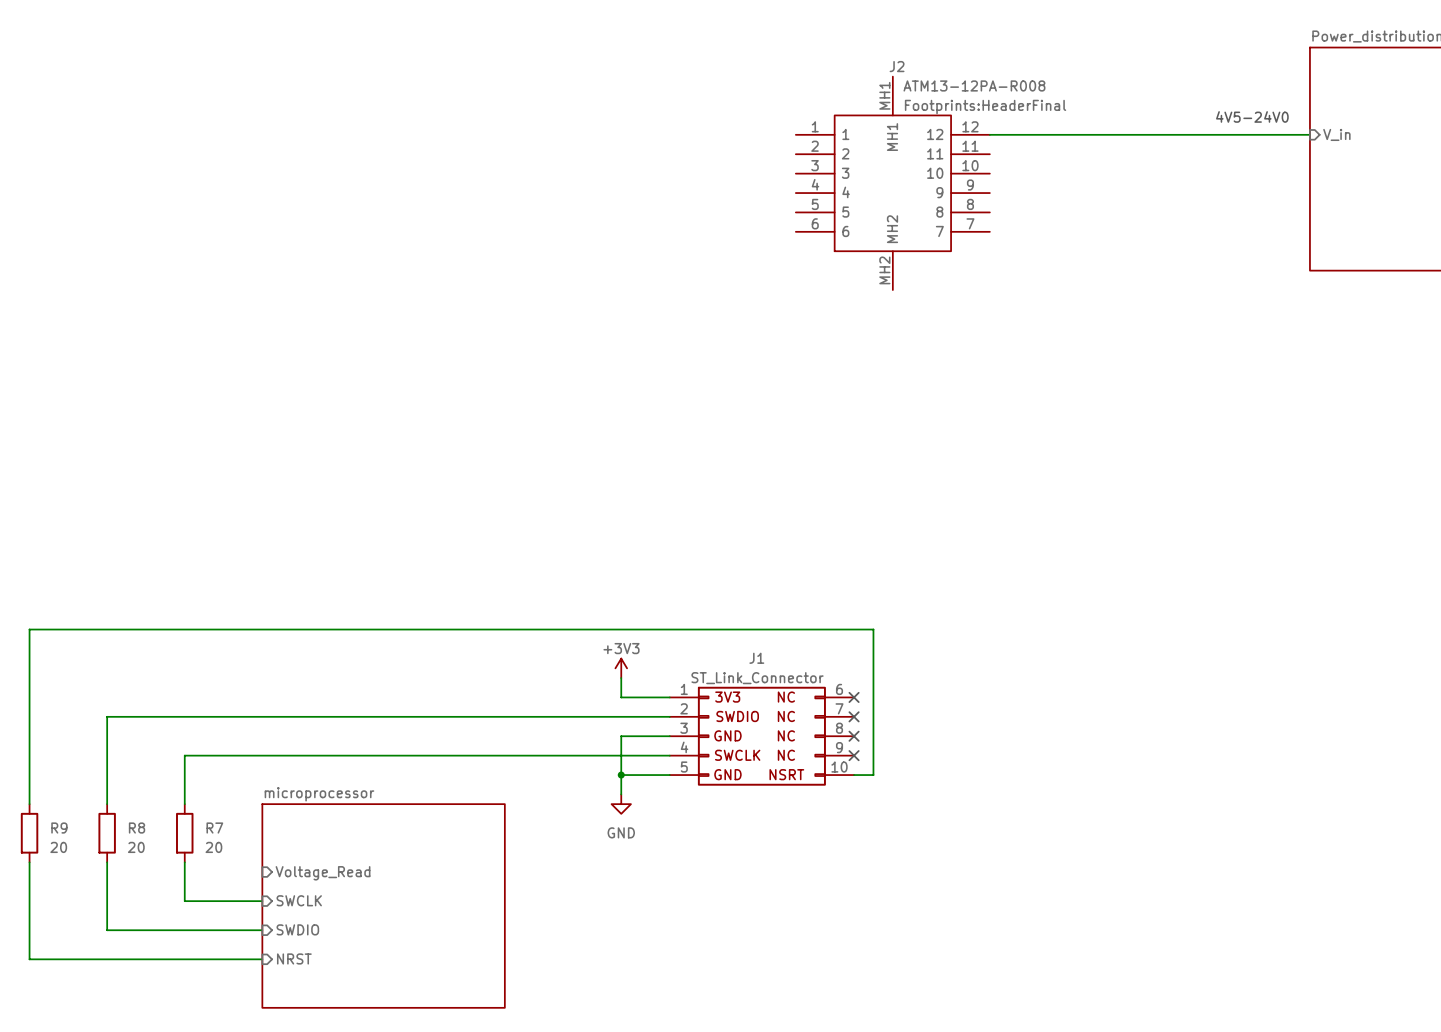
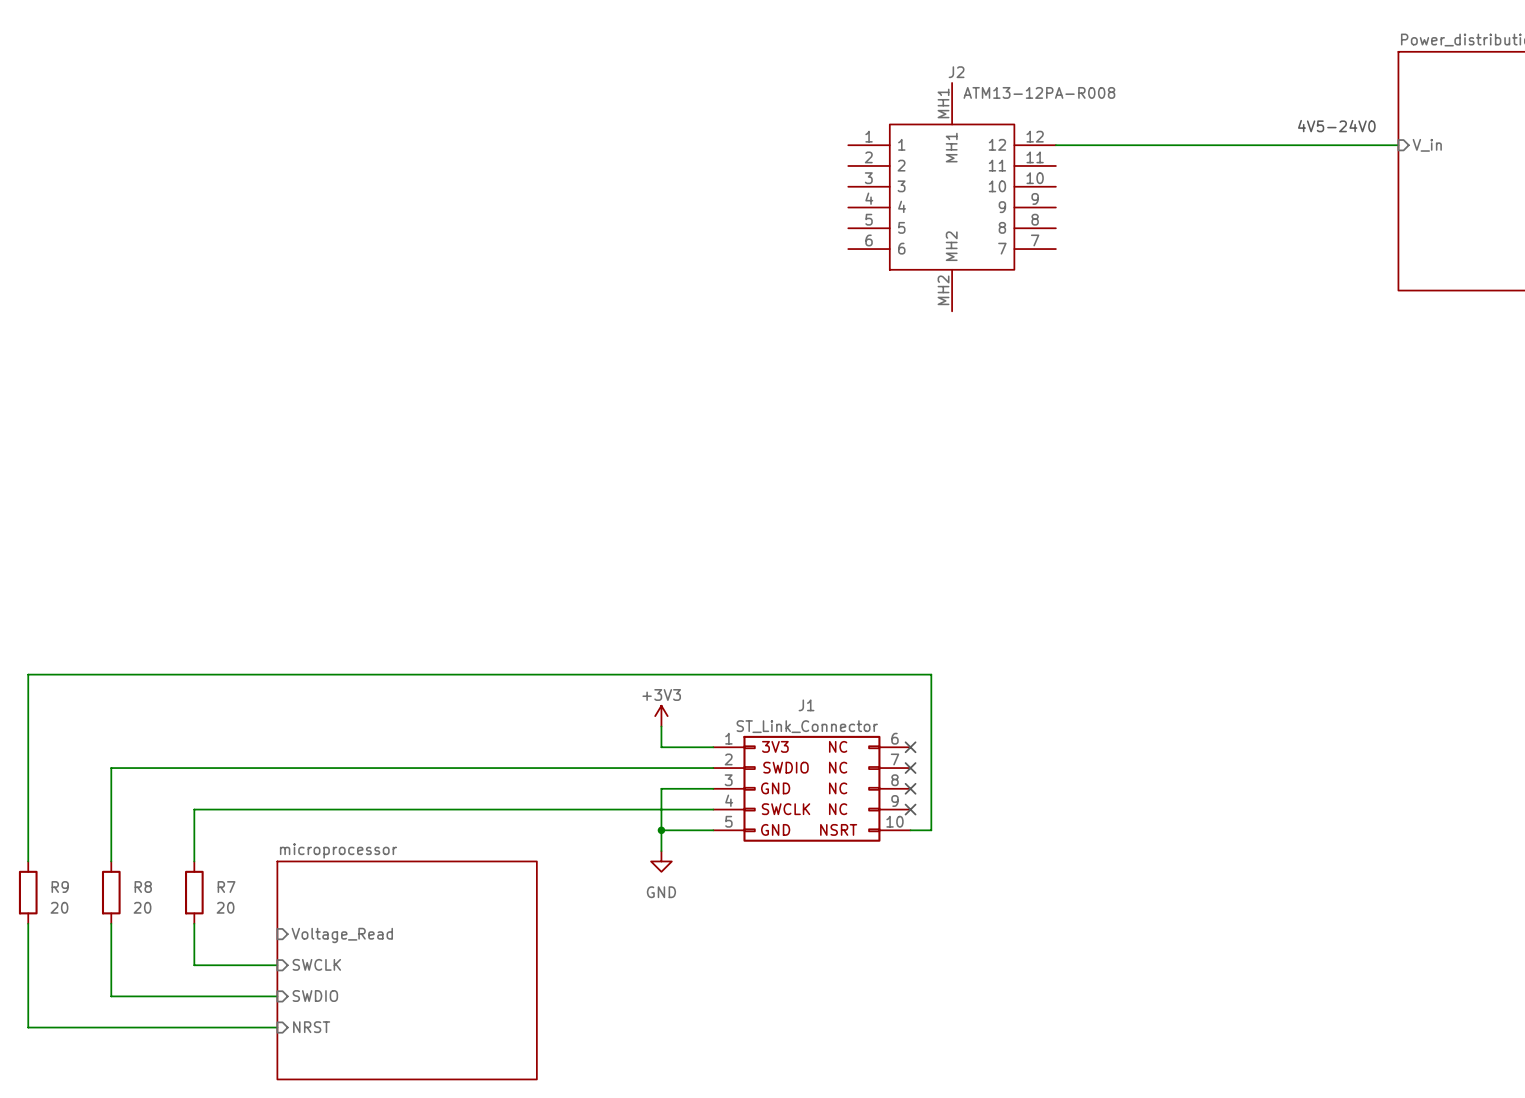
J2 text: Footprints:HeaderFinal (985, 106) -> none

